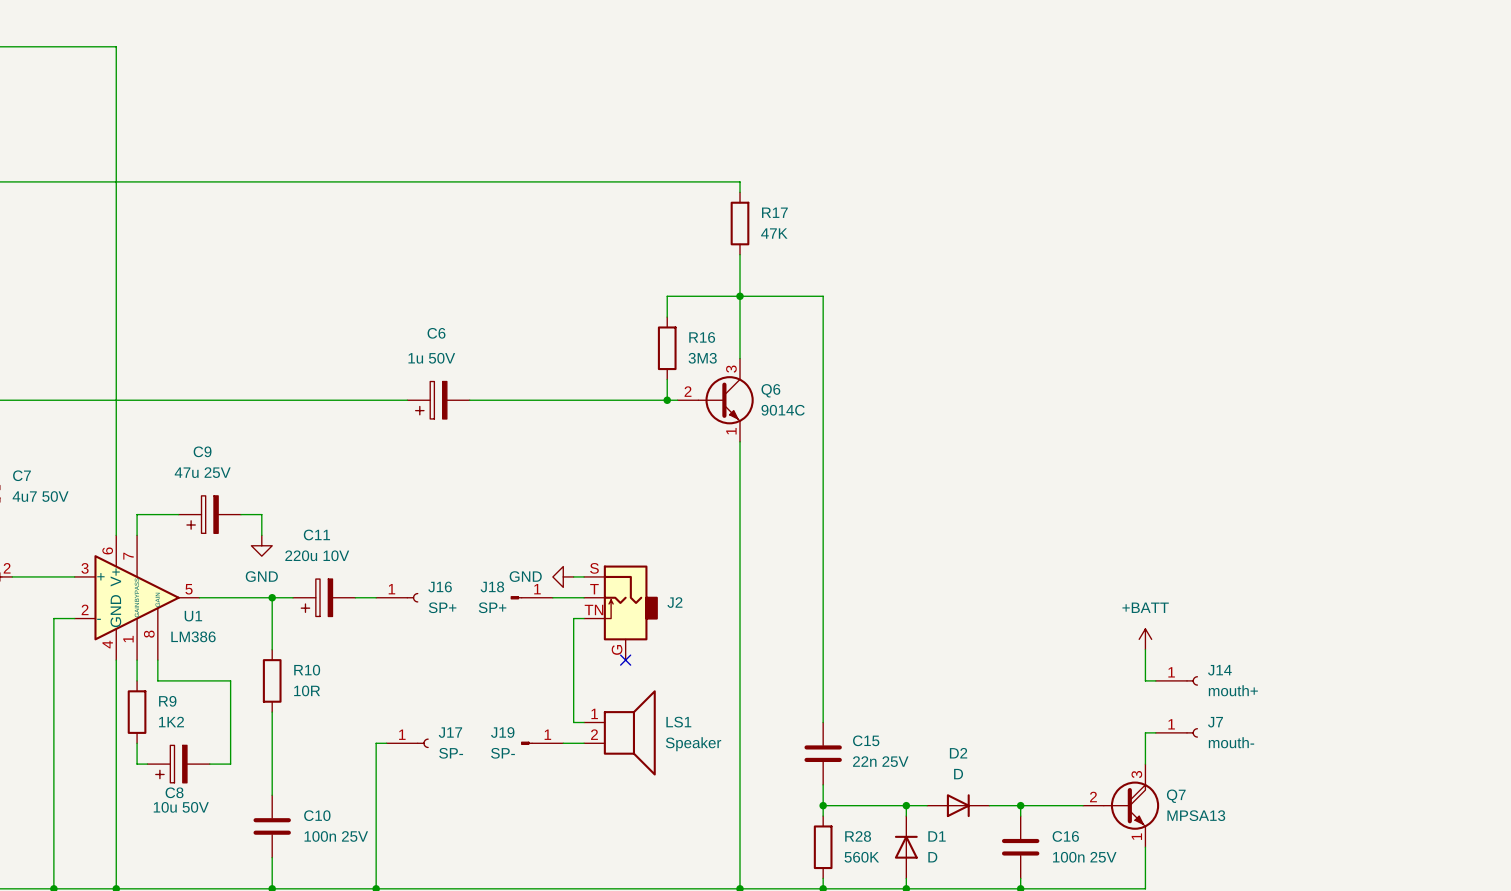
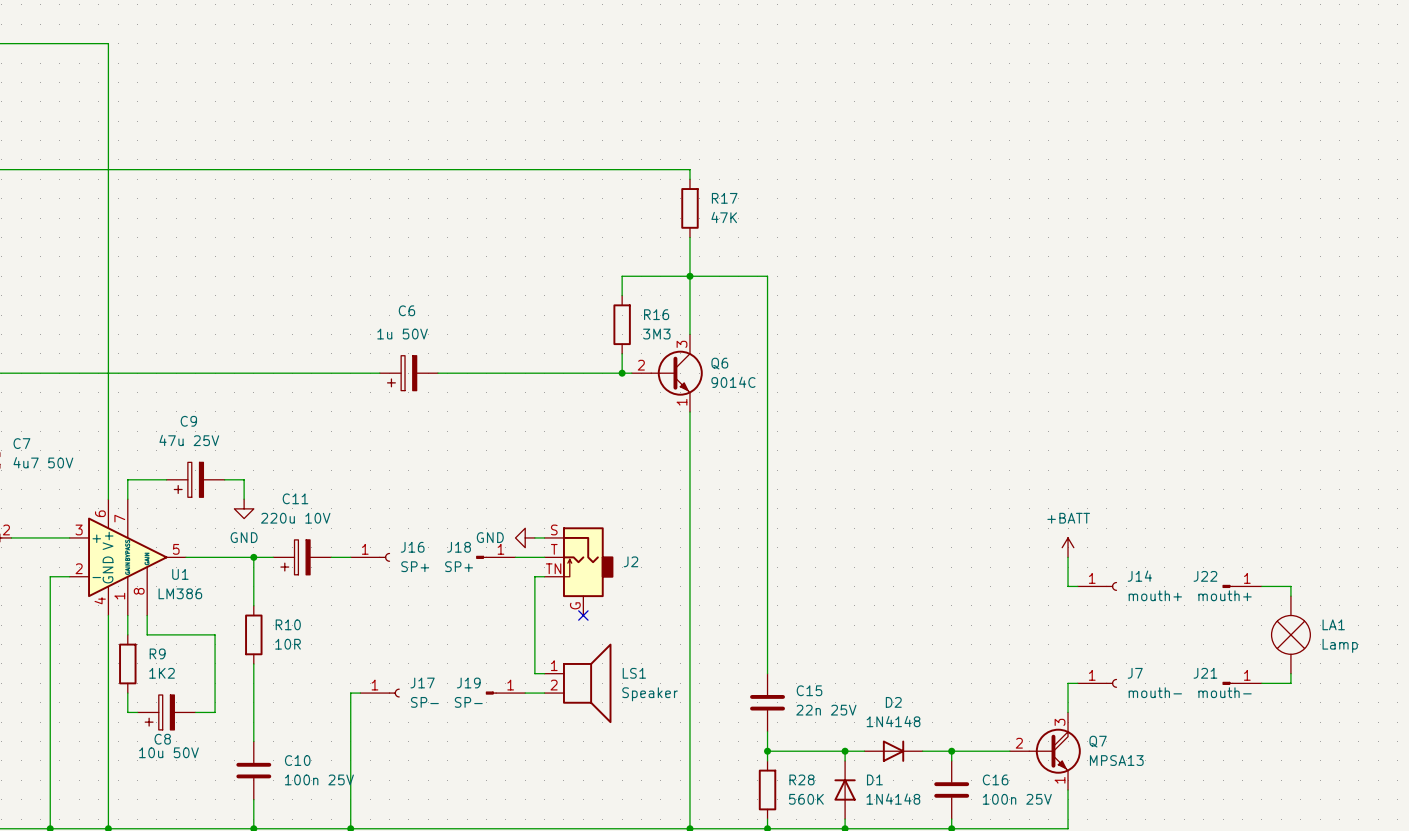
J22: none -> mouth+ (1242, 586)
wire: none -> (1261, 586) (1290, 586) (1290, 596)
power symbol position: +BATT (1145, 639) -> +BATT (1068, 547)
wire: (1145, 649) (1145, 680) (1155, 680) -> (1068, 557) (1068, 586) (1077, 586)
J14 position: (1176, 680) -> (1097, 586)
LA1: none -> Lamp (1290, 634)
wire: none -> (1290, 673) (1290, 683) (1261, 683)
J21: none -> mouth- (1242, 683)
D2 value: D (958, 774) -> 1N4148 (893, 721)
D1 value: D (932, 857) -> 1N4148 (893, 799)

